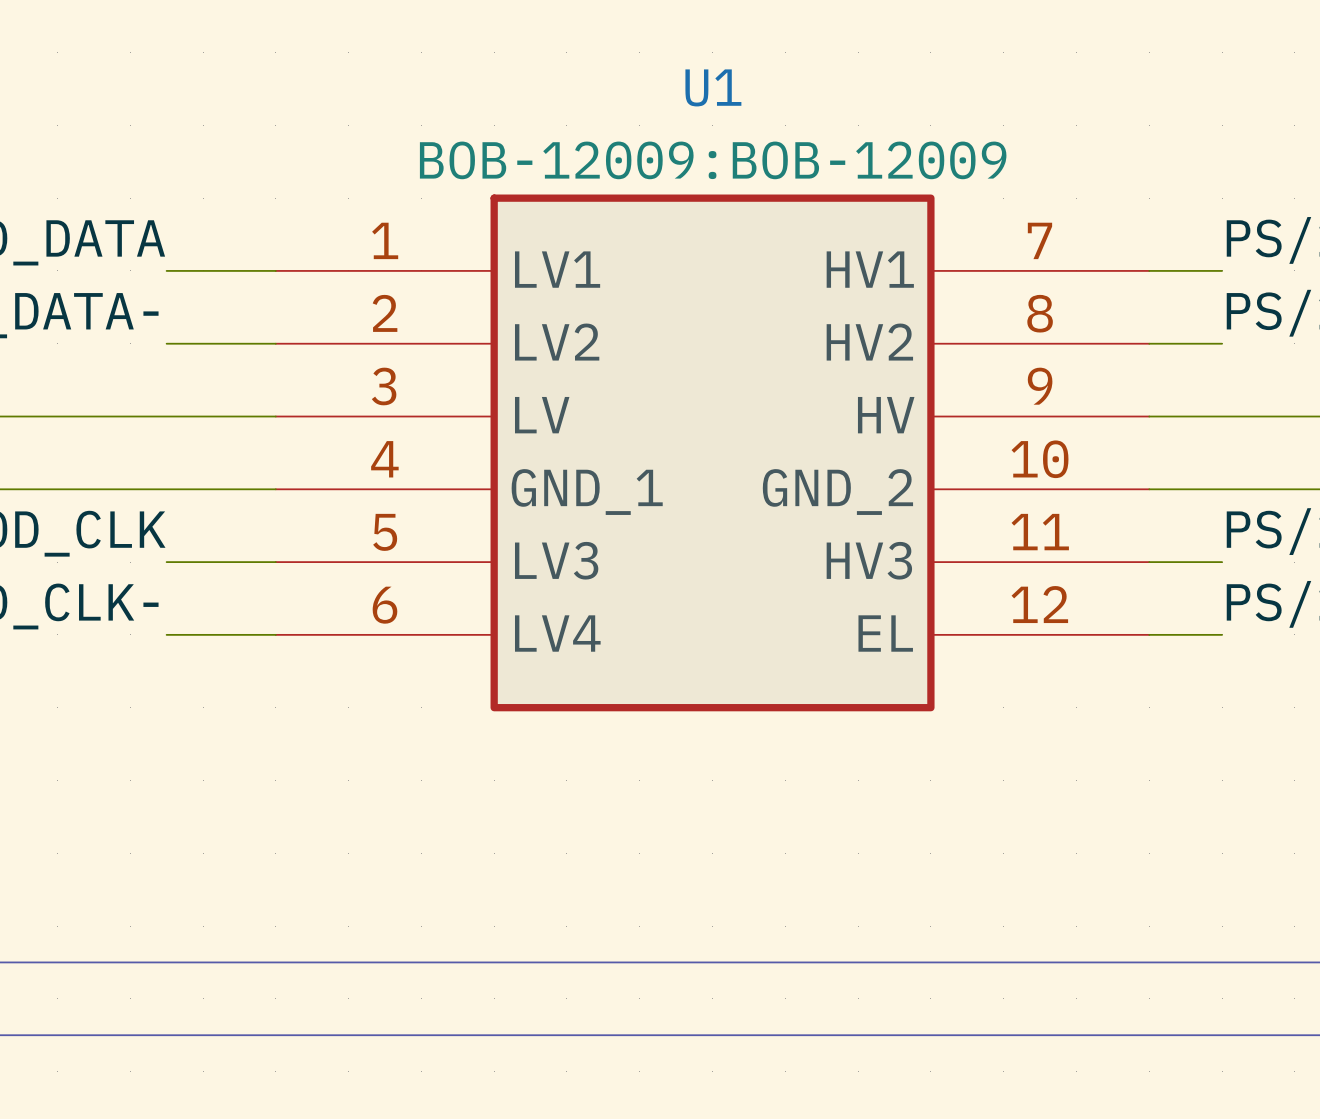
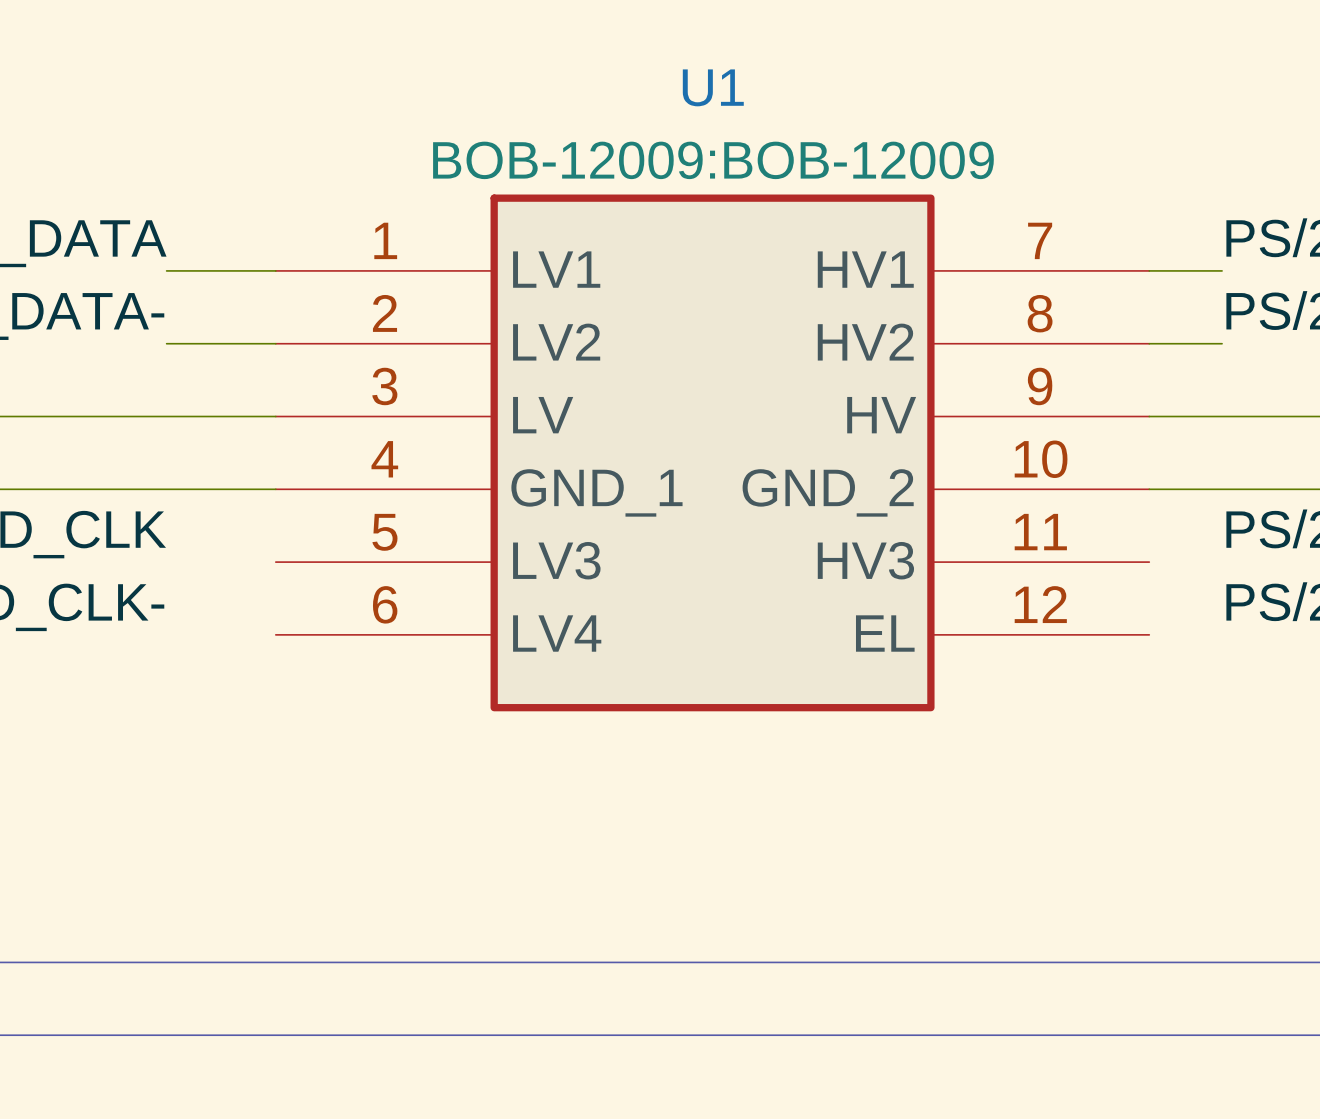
wire: (166, 562) (275, 562) -> none
wire: (1149, 562) (1222, 562) -> none
wire: (166, 634) (275, 634) -> none
wire: (1149, 634) (1222, 634) -> none

